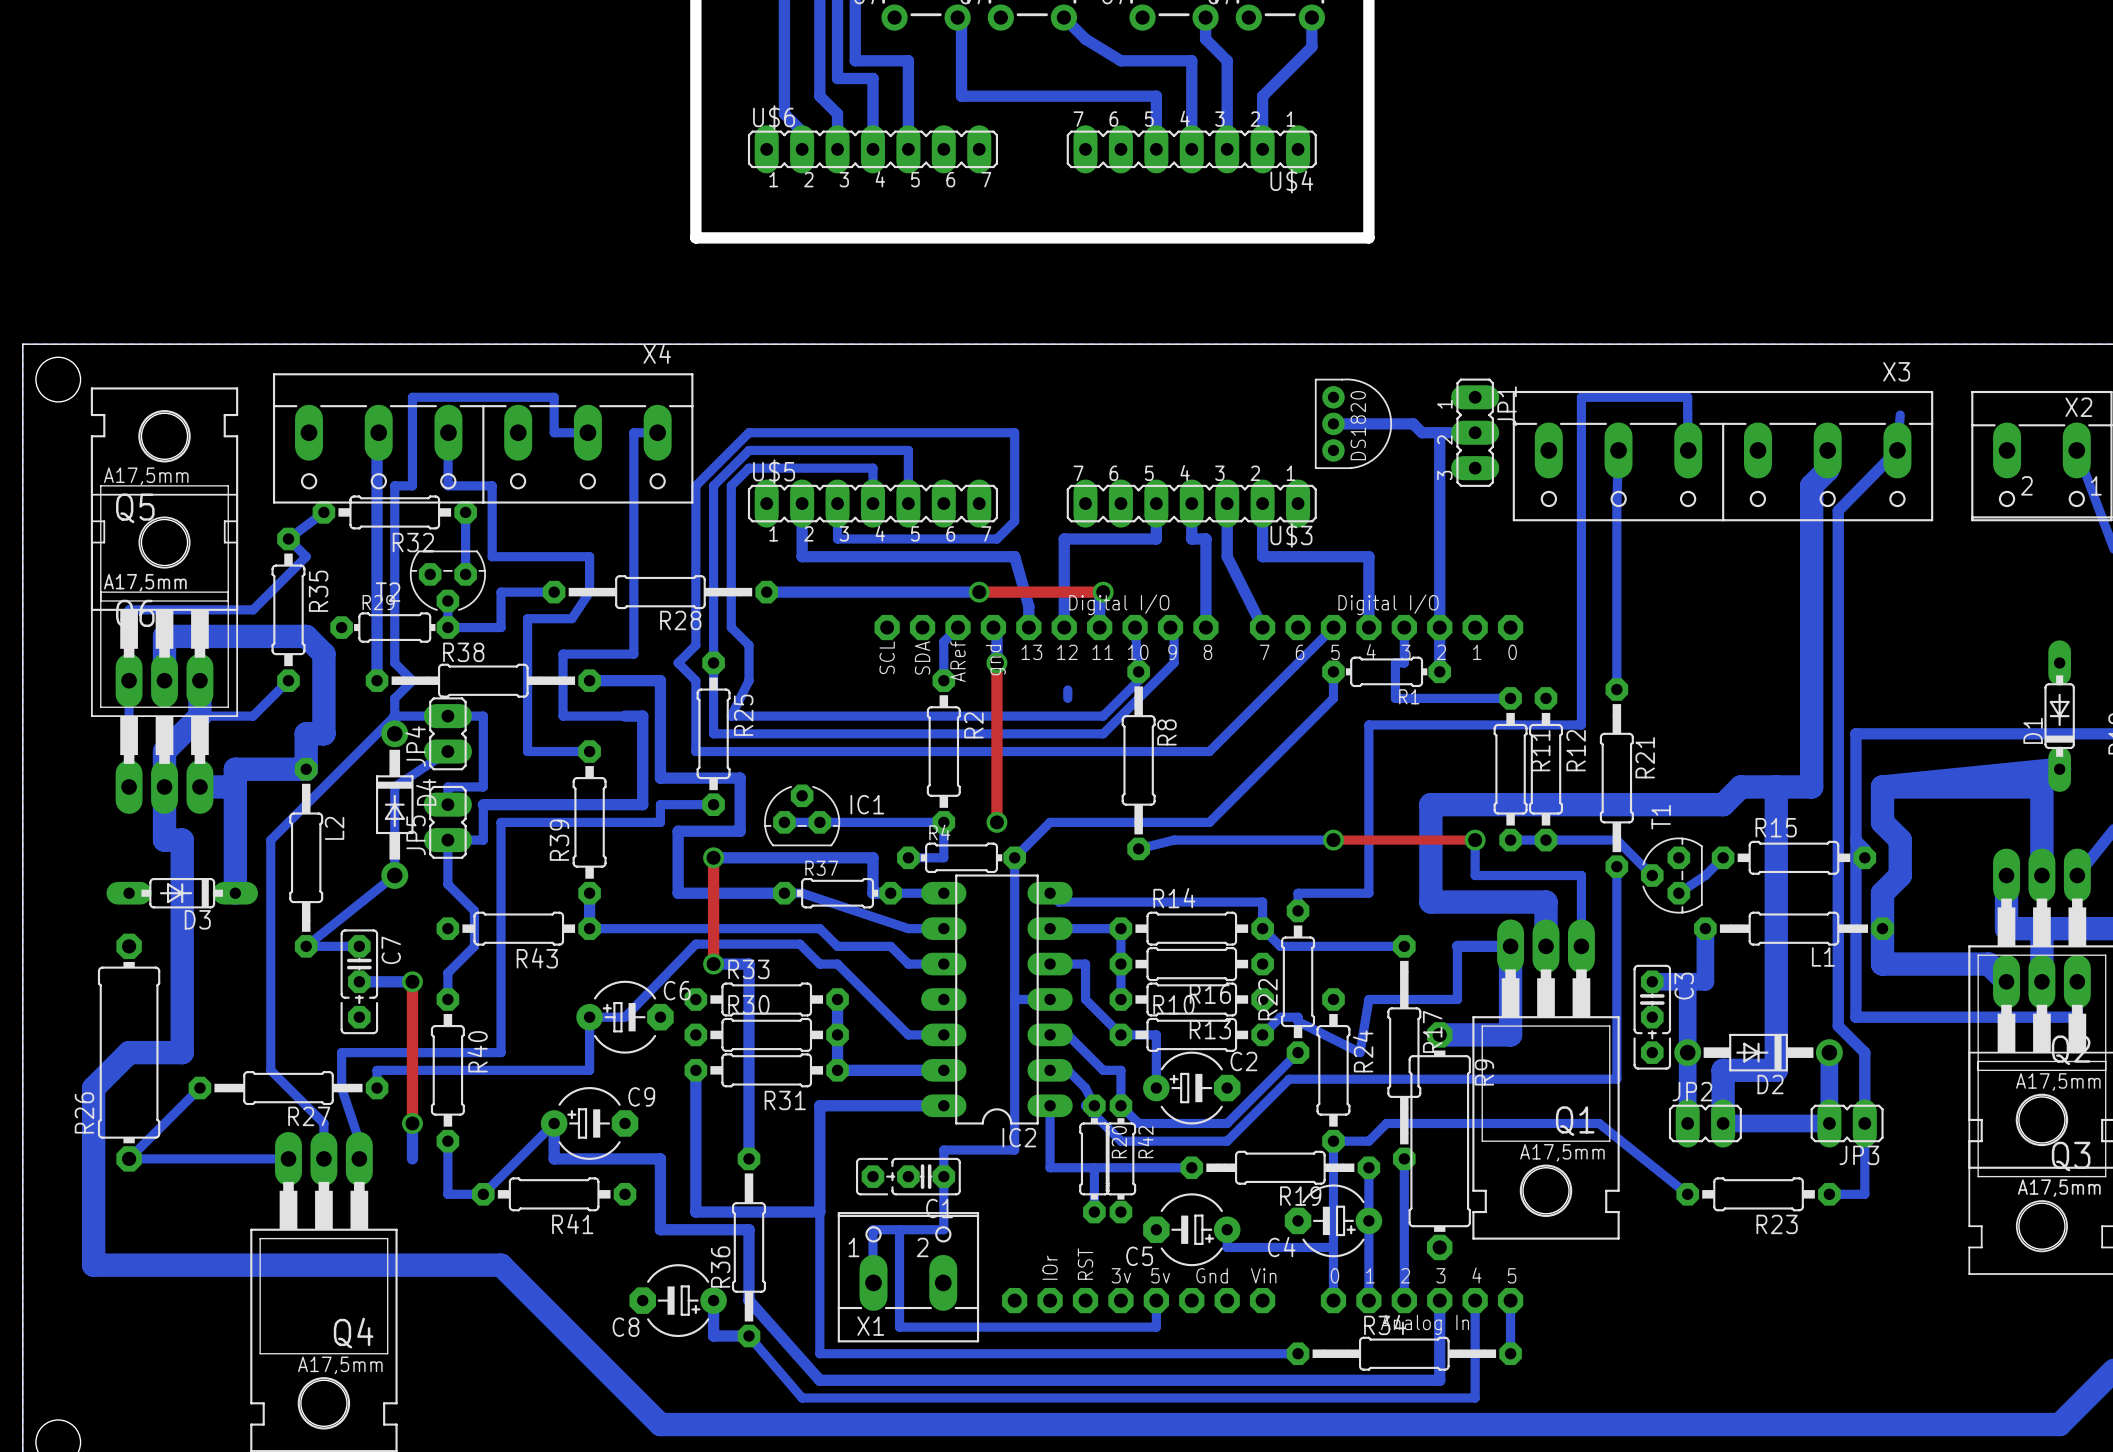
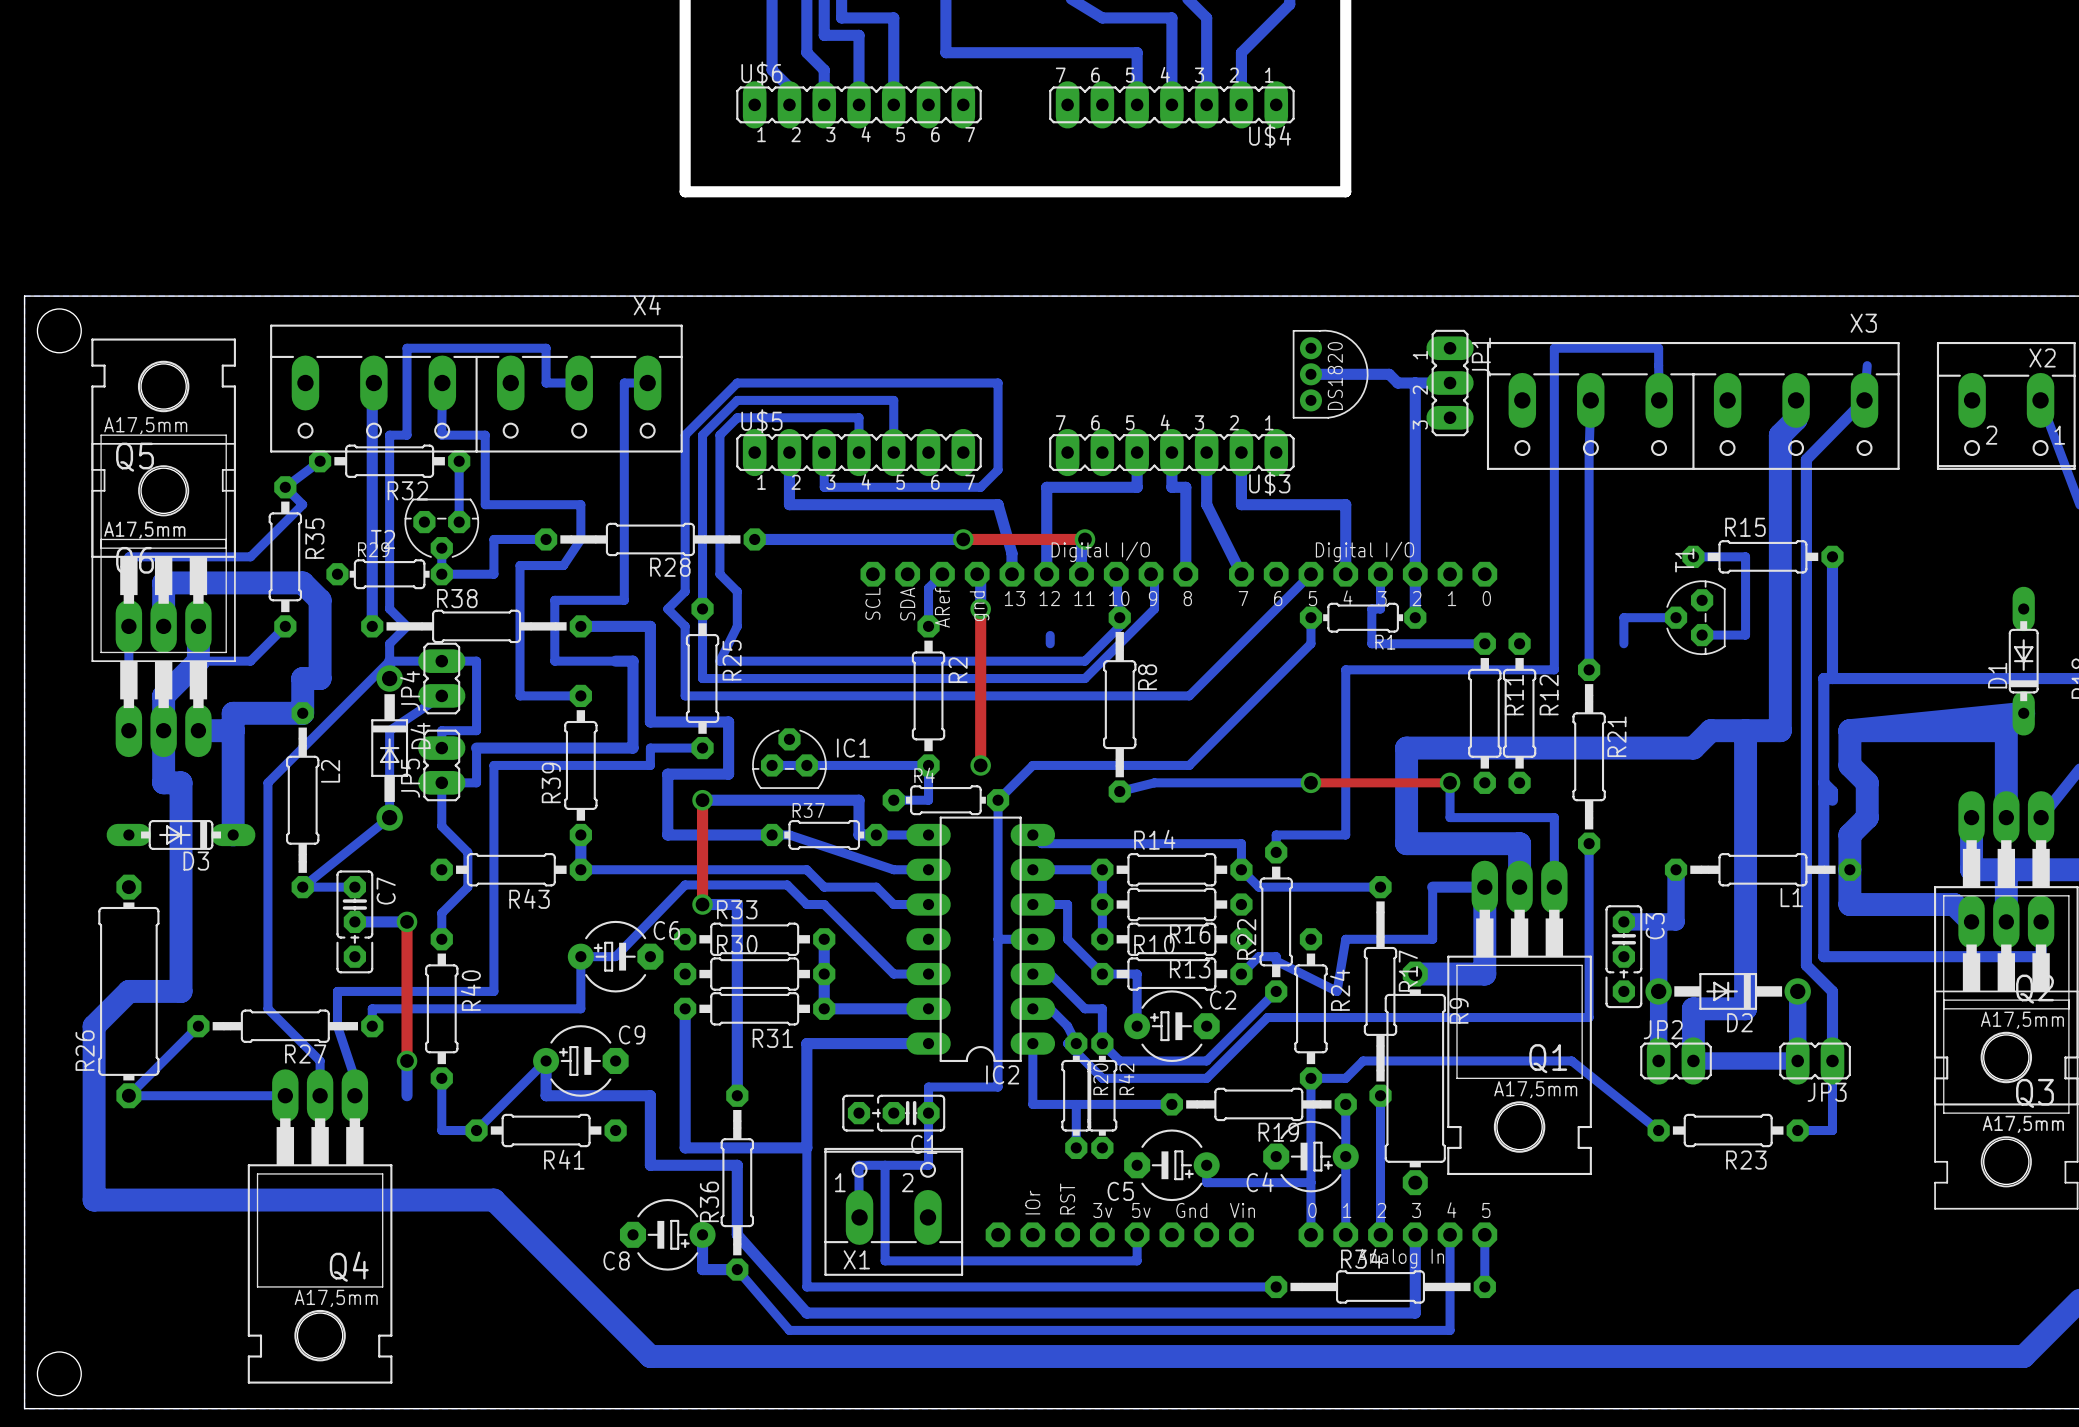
bottom track: none -> (1693, 556) (1745, 556) (1745, 635) (1702, 635)
bottom track: none -> (1832, 556) (1832, 678)
bottom track: none -> (1676, 617) (1623, 617) (1623, 643)
R21 position: (1616, 778) -> (1589, 756)
T1 footprint: [1640, 837, 1703, 914] -> [1664, 580, 1726, 656]
bottom track: (1510, 840) (1616, 840) (1652, 875) -> none
bottom track: (1723, 857) (1705, 875) (1678, 893) -> none
R15 position: (1793, 857) -> (1762, 556)
bottom track: (1616, 866) (1616, 902) -> (1589, 635) (1589, 669)

